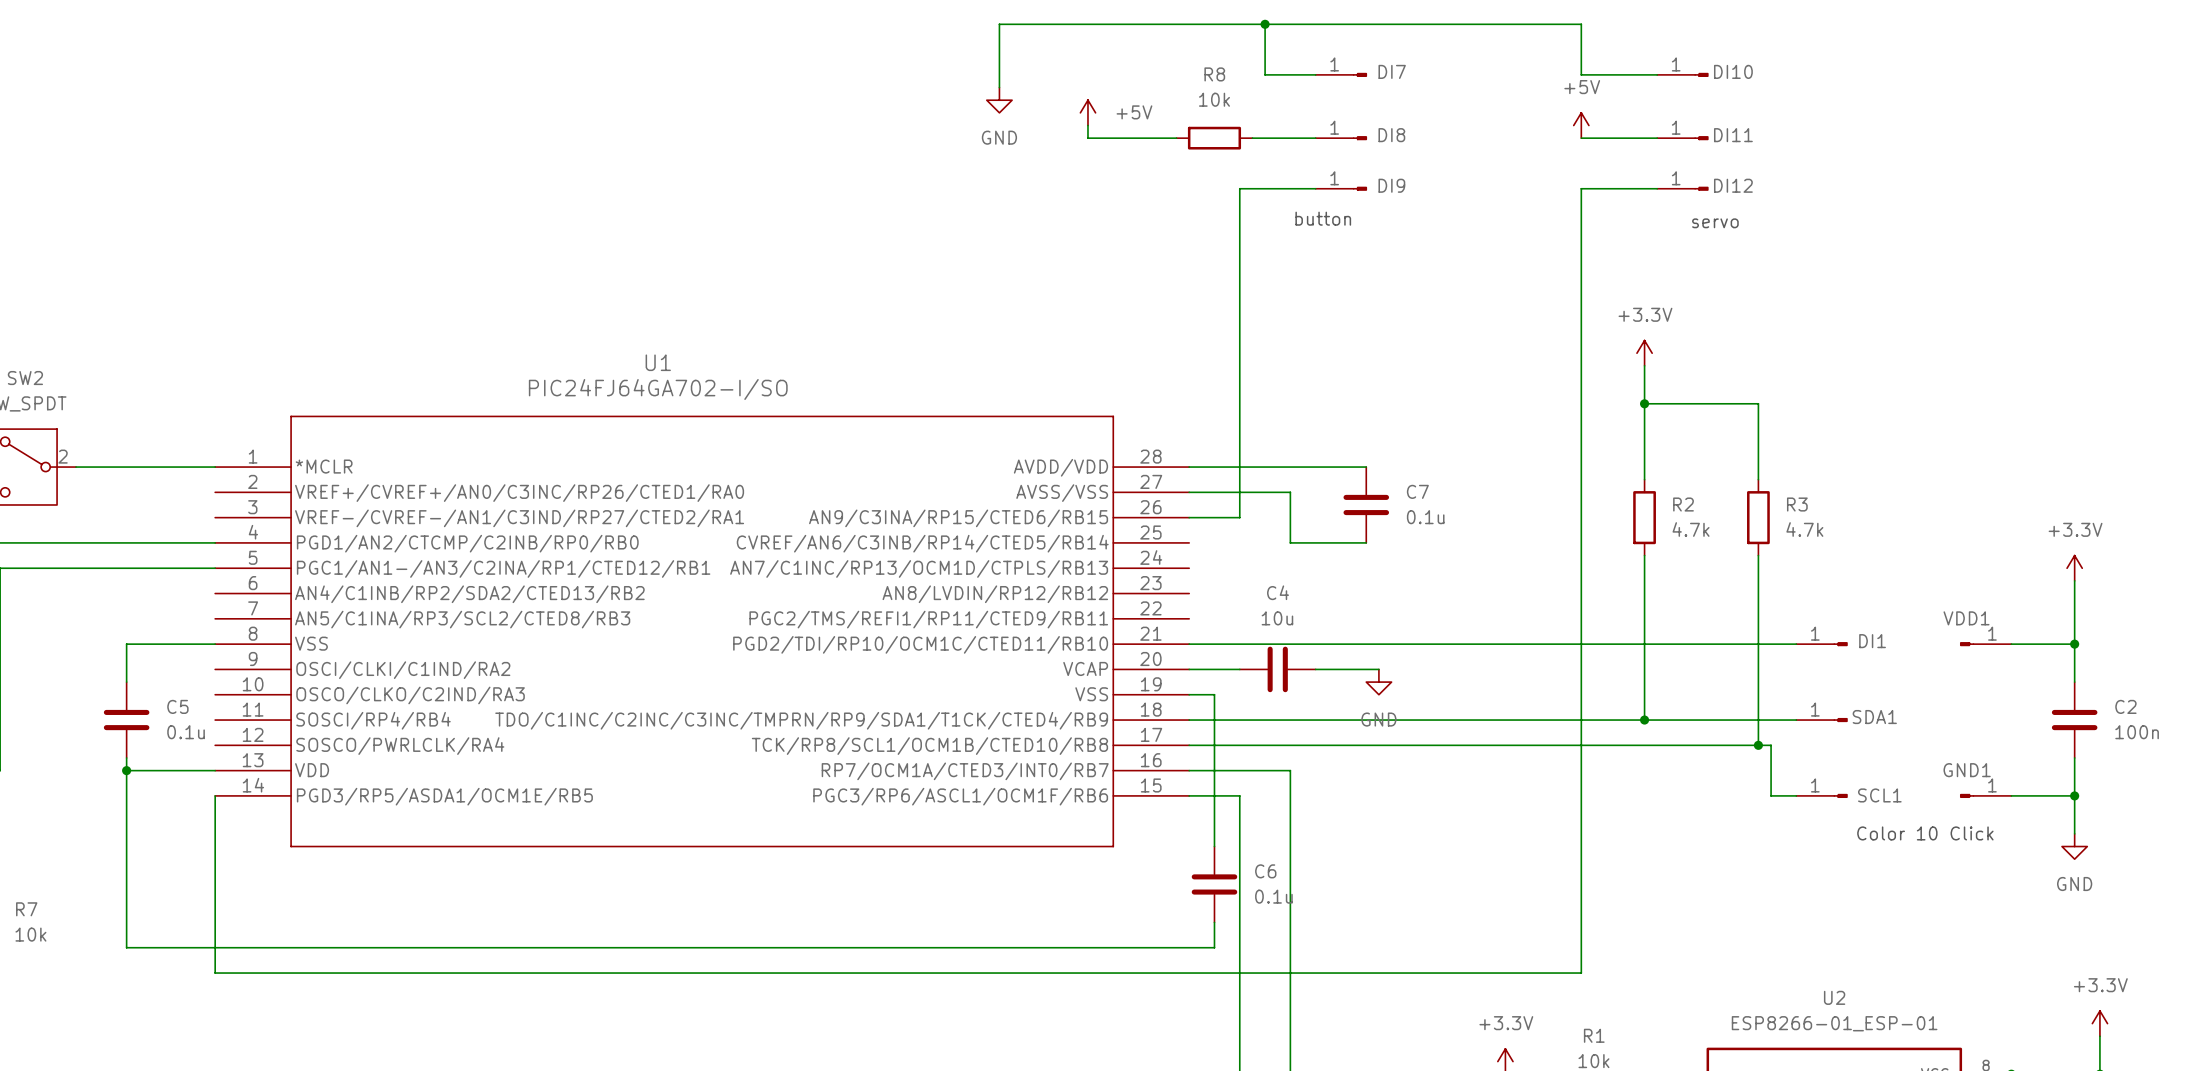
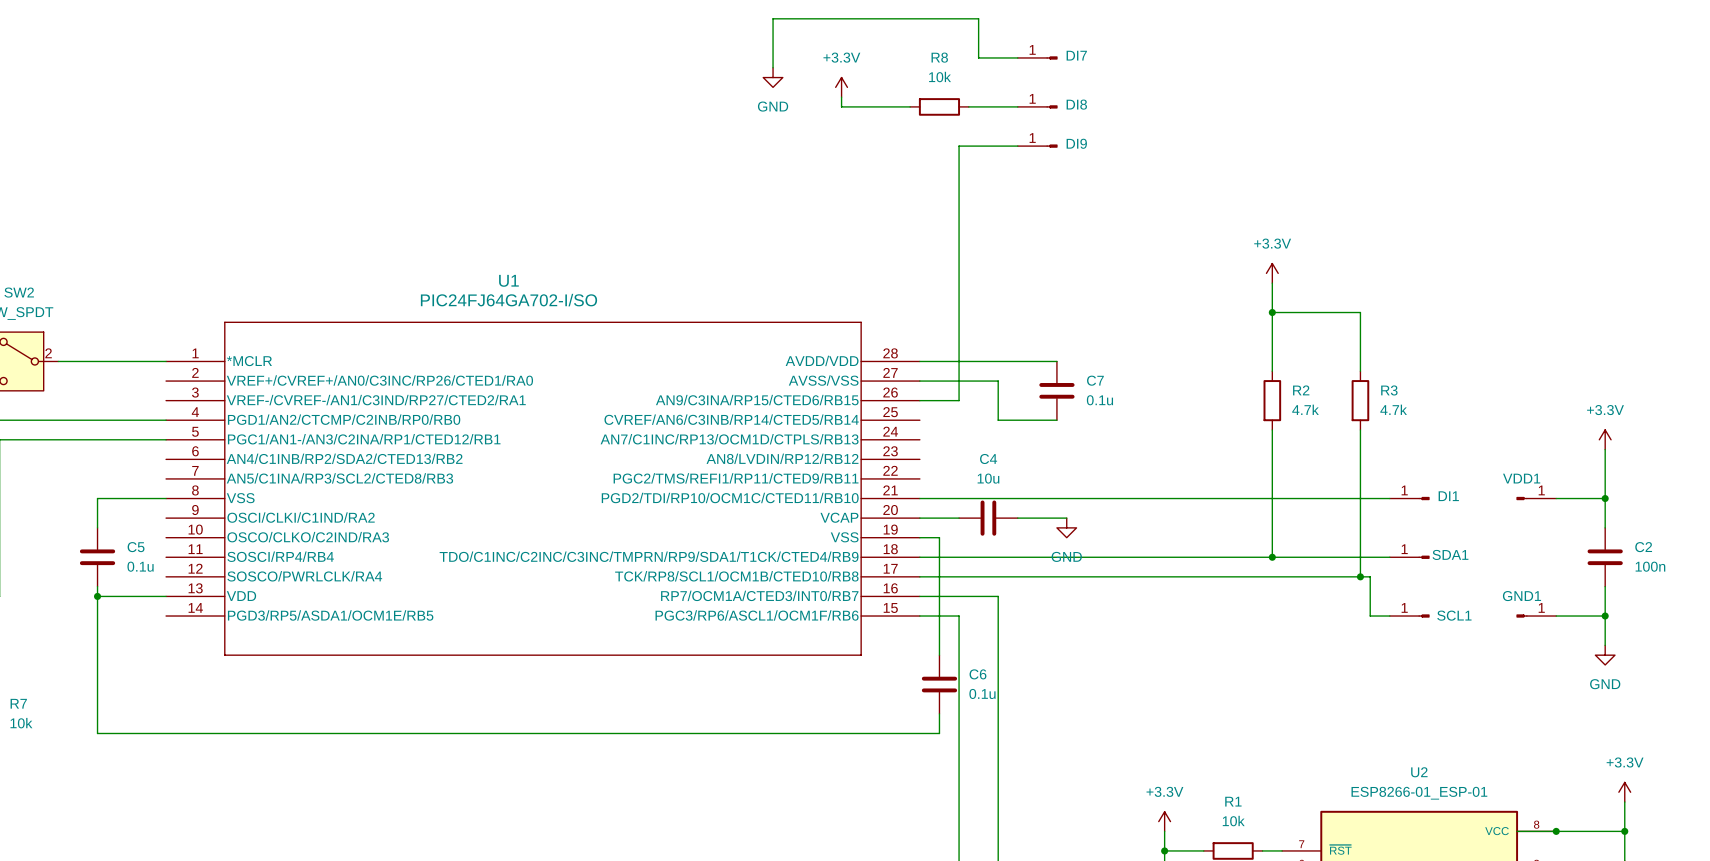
wire: (1265, 24) (1581, 24) (1581, 74) (1657, 74) -> none
junction: (1265, 24) -> none
DI10: (1682, 74) -> none
power symbol: +5V (1087, 112) -> +3.3V (841, 87)
power symbol: +5V (1581, 125) -> none
wire: (1581, 138) (1657, 138) -> none
DI11: (1682, 138) -> none
wire: (1657, 188) (1581, 188) (1581, 973) (215, 973) (215, 795) -> none
DI12: (1682, 188) -> none
text: button (1323, 218) -> none
text: servo (1715, 223) -> none
text: Color 10 Click (1925, 833) -> none

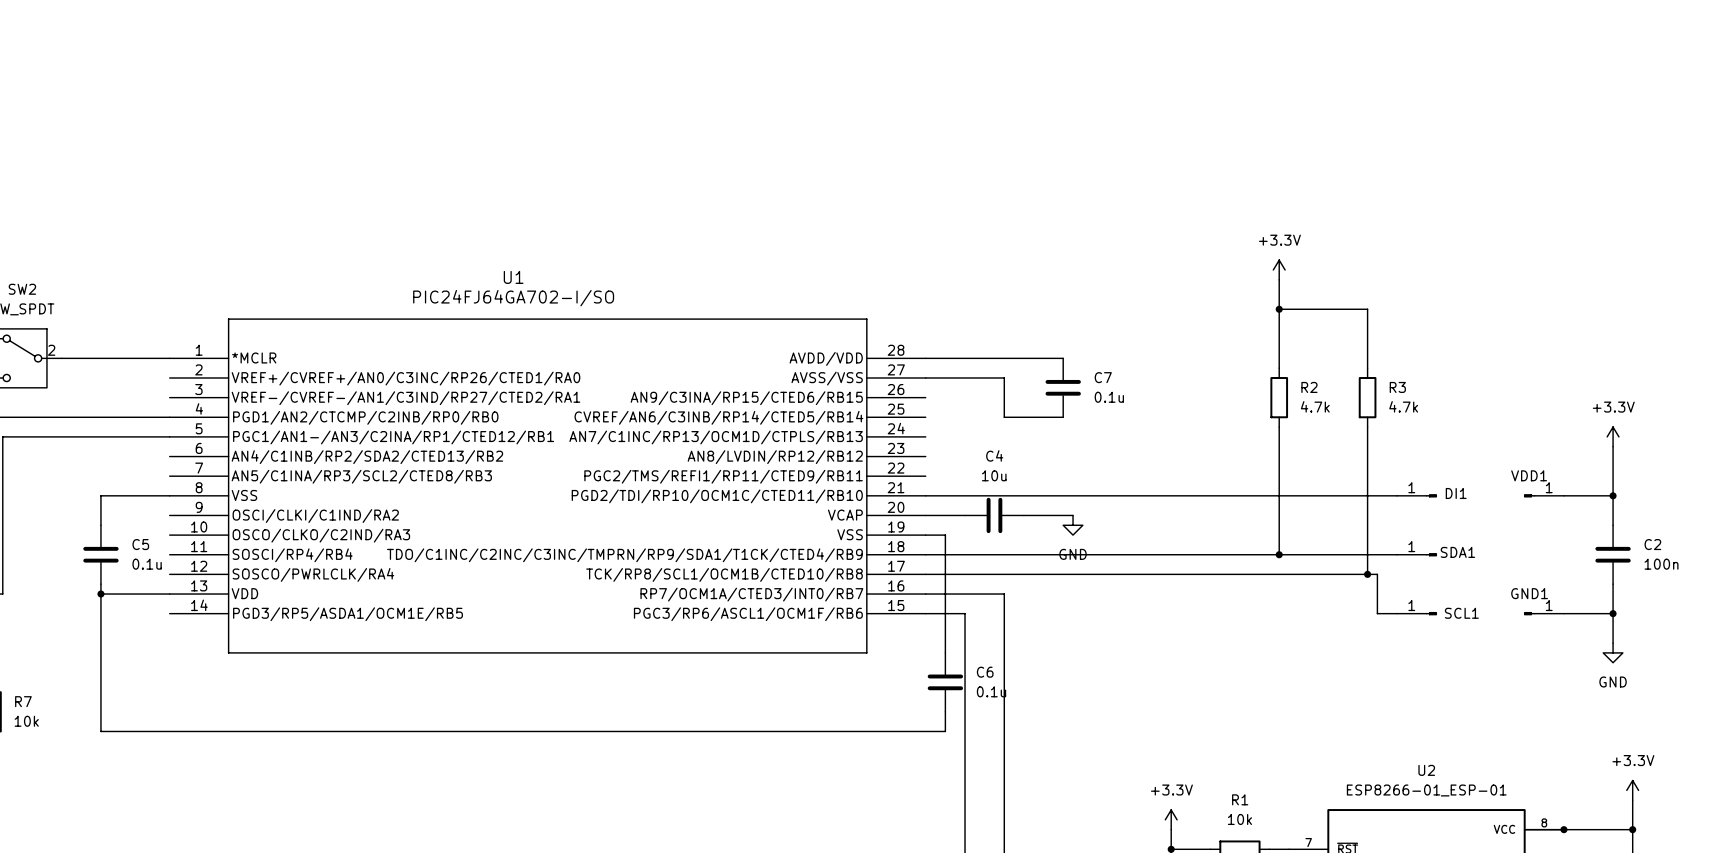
wire: (1017, 57) (978, 57) (978, 18) (773, 18) (773, 67) -> none
DI7: (1037, 57) -> none
power symbol: GND (773, 77) -> none
power symbol: +3.3V (841, 87) -> none
wire: (841, 97) (841, 106) (910, 106) -> none
R8: 10k (939, 106) -> none
wire: (968, 106) (1017, 106) -> none
DI8: (1037, 106) -> none
wire: (1017, 146) (959, 146) (959, 400) (919, 400) -> none
DI9: (1037, 146) -> none

